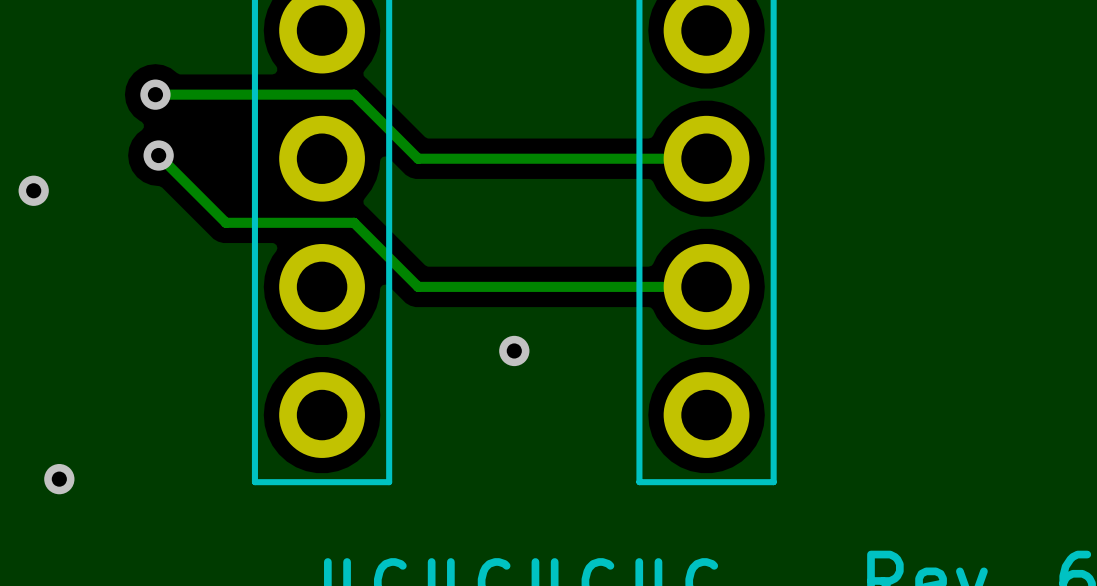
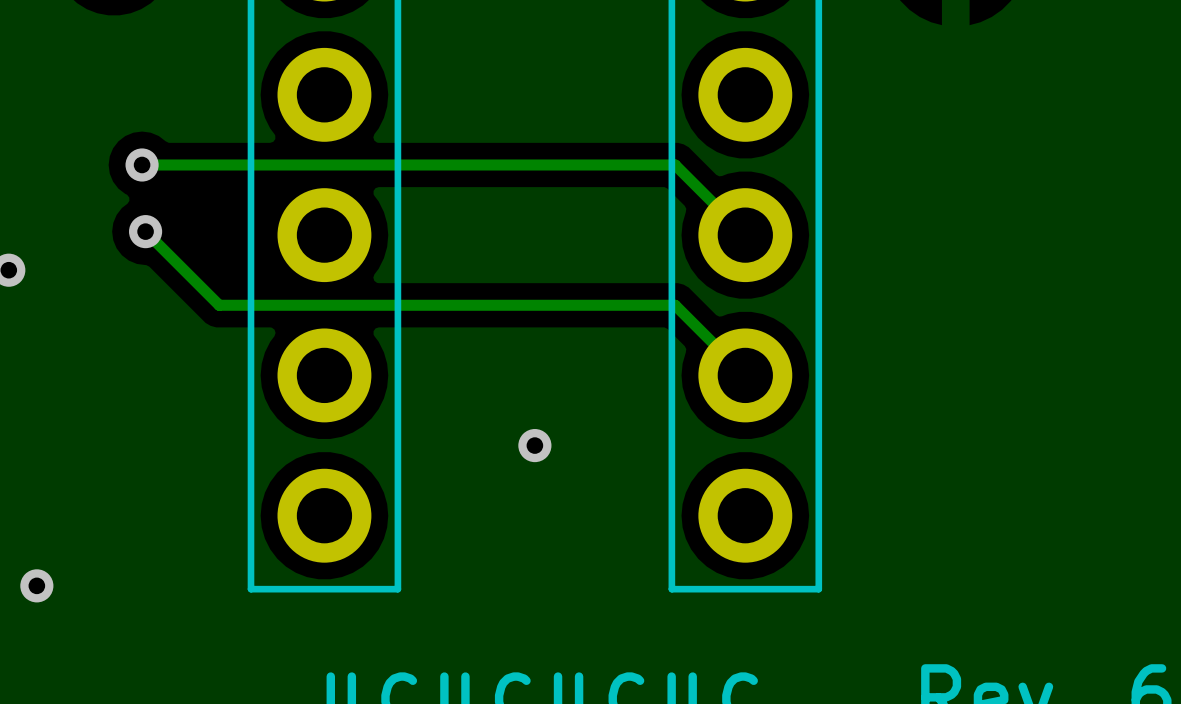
track: (354, 94) (418, 158) (706, 158) -> (359, 164) (675, 164) (745, 235)
track: (354, 222) (418, 286) (706, 286) -> (359, 305) (675, 305) (745, 375)

